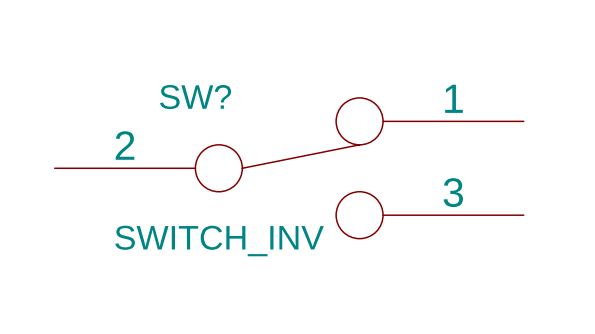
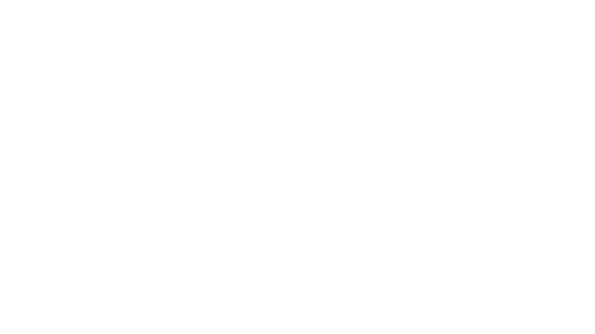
SW?: SWITCH_INV (289, 168) -> none

